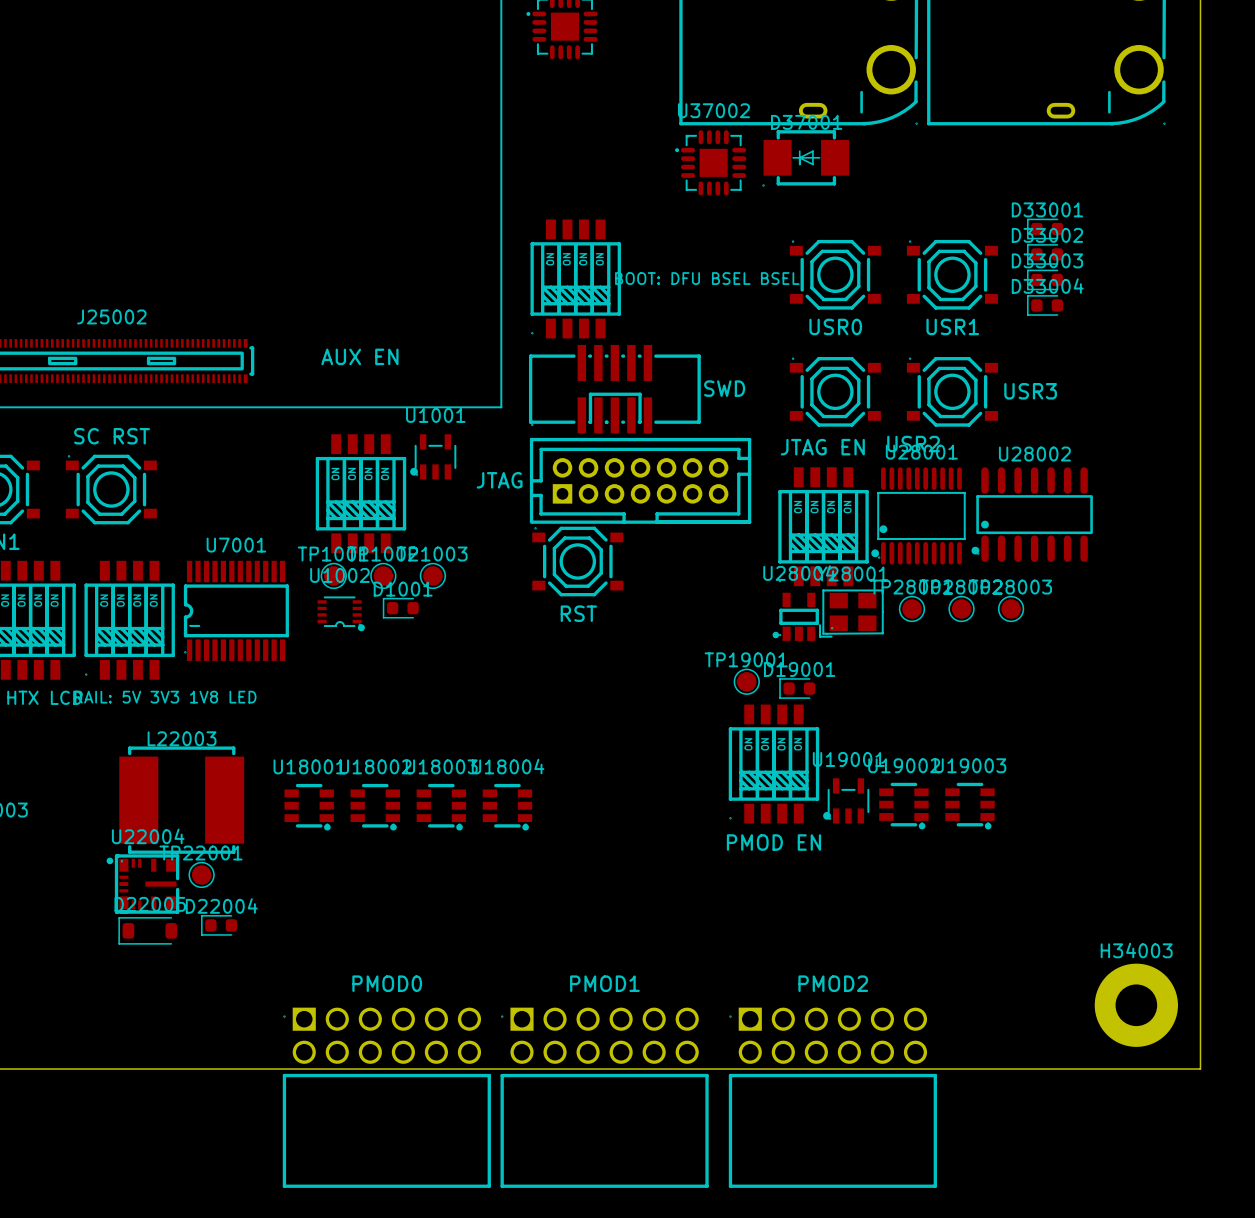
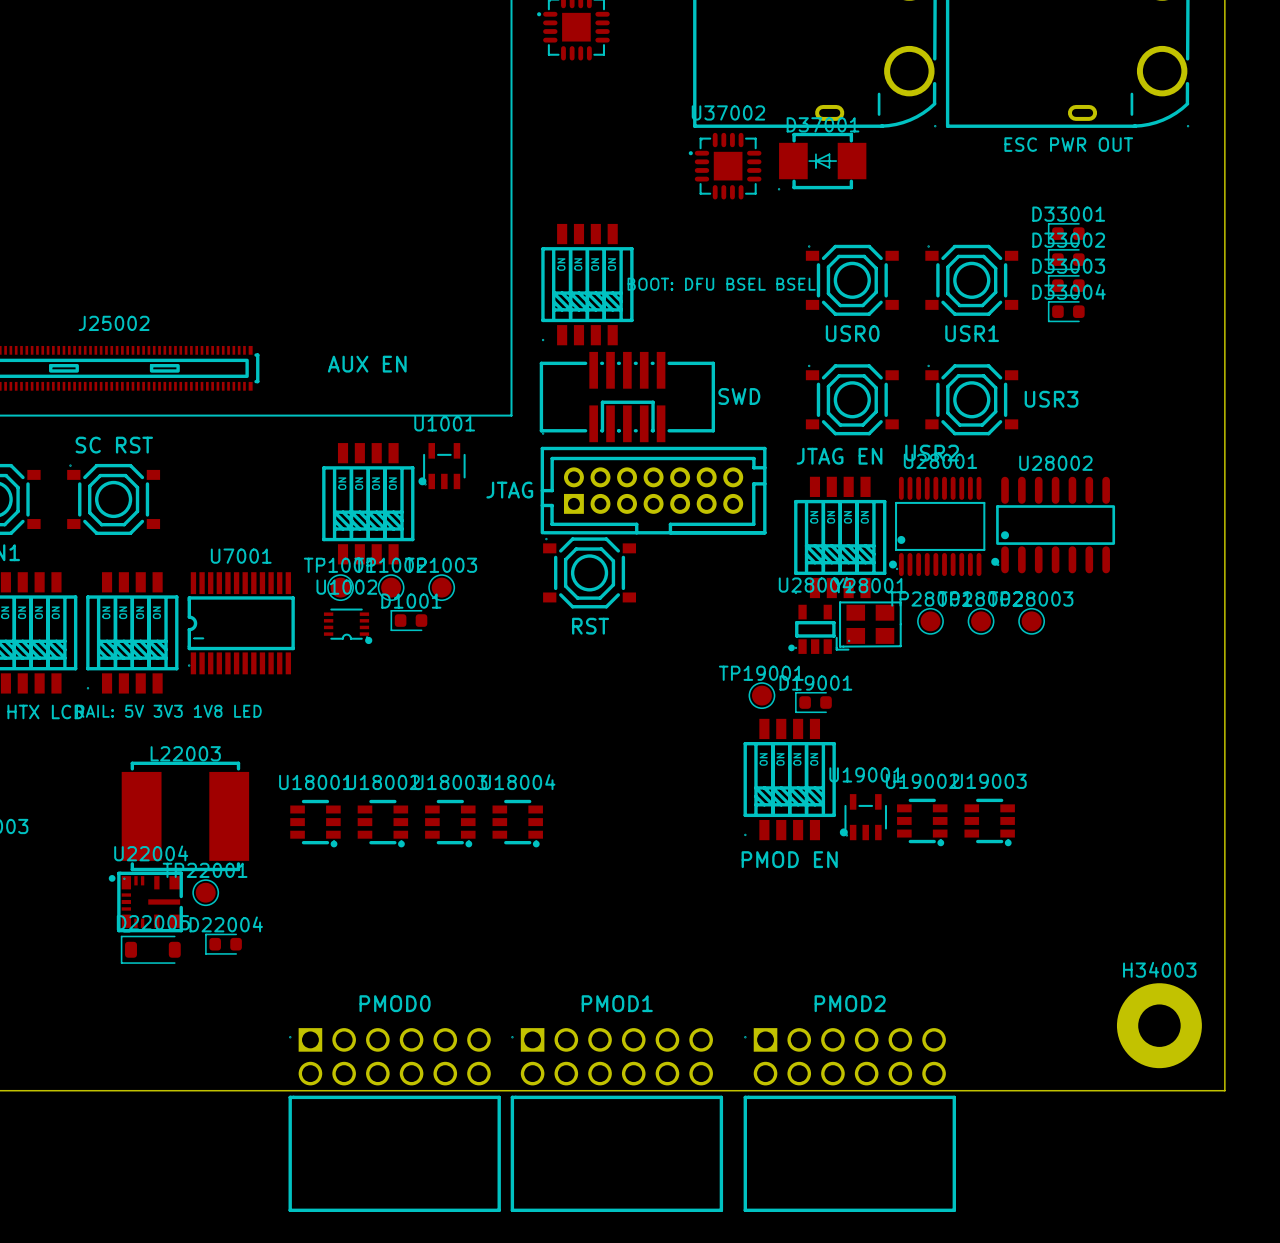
text: none -> ESC PWR OUT (1068, 144)

